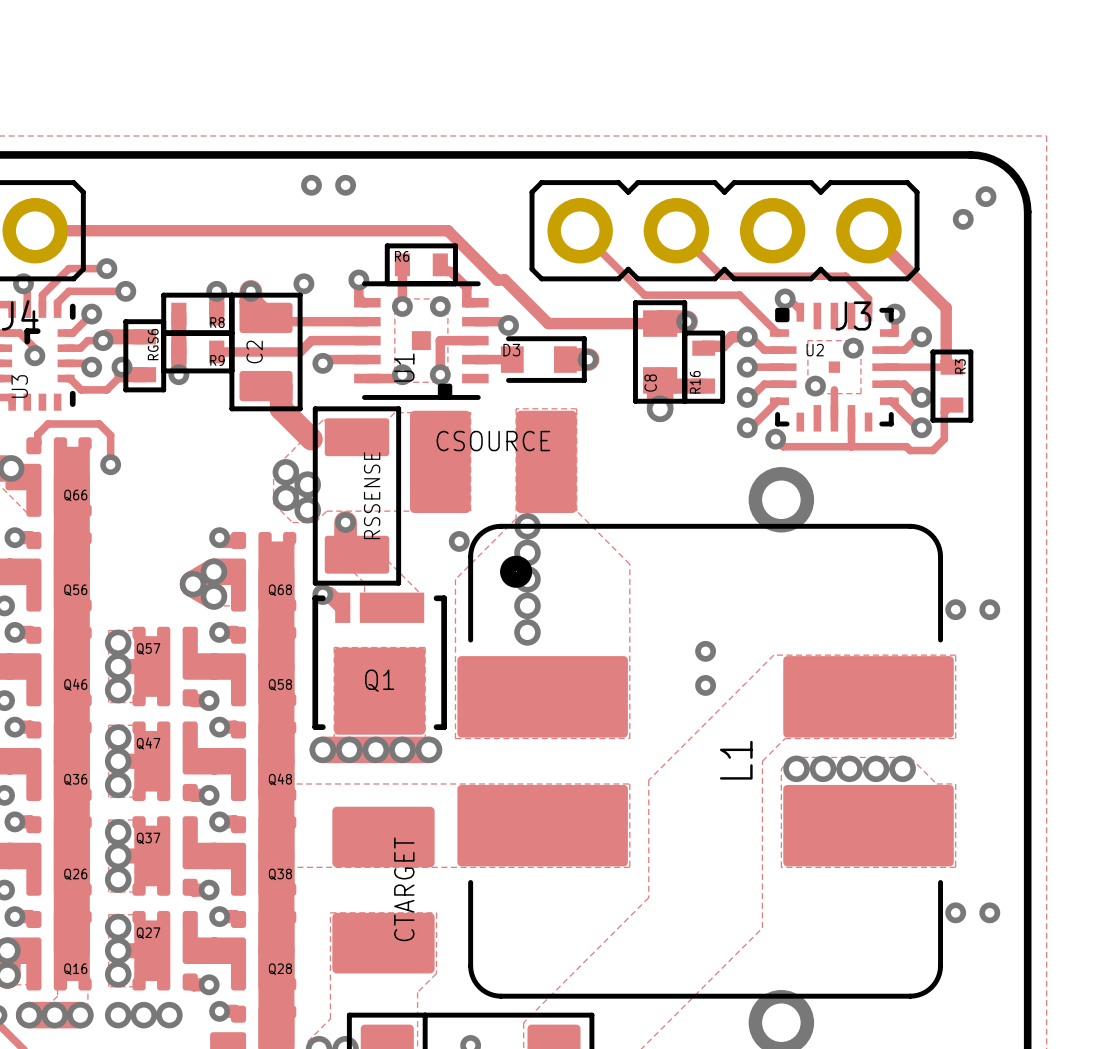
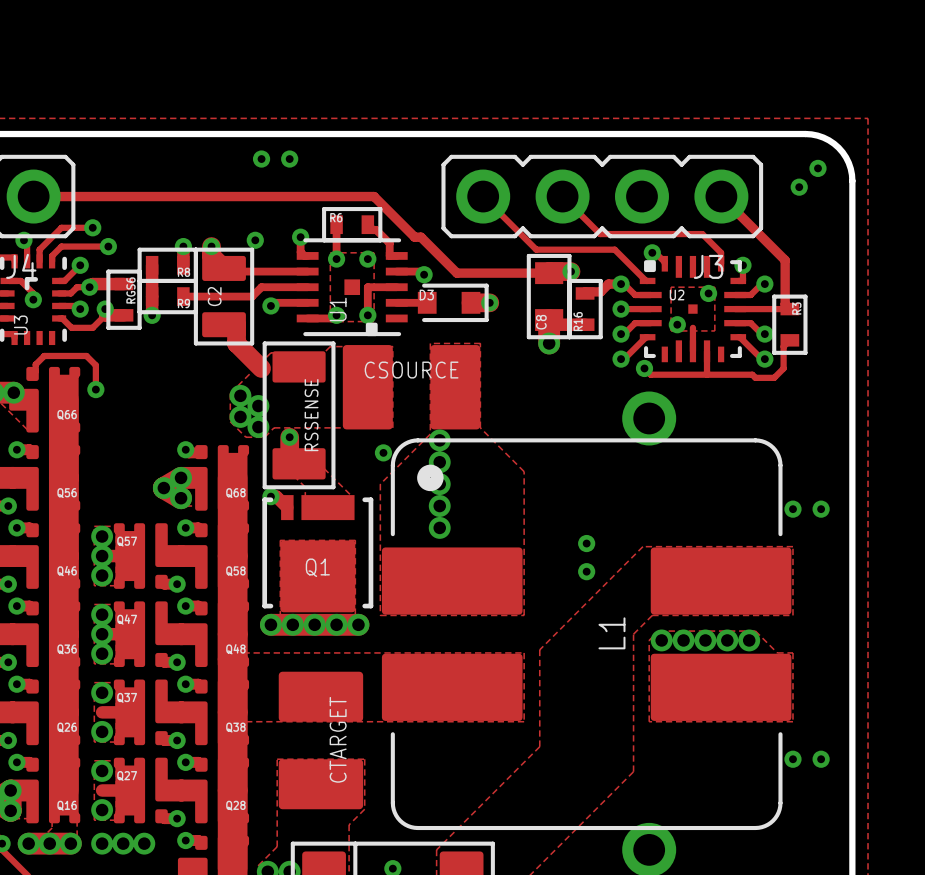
via: (118, 855) -> none
via: (118, 950) -> none

